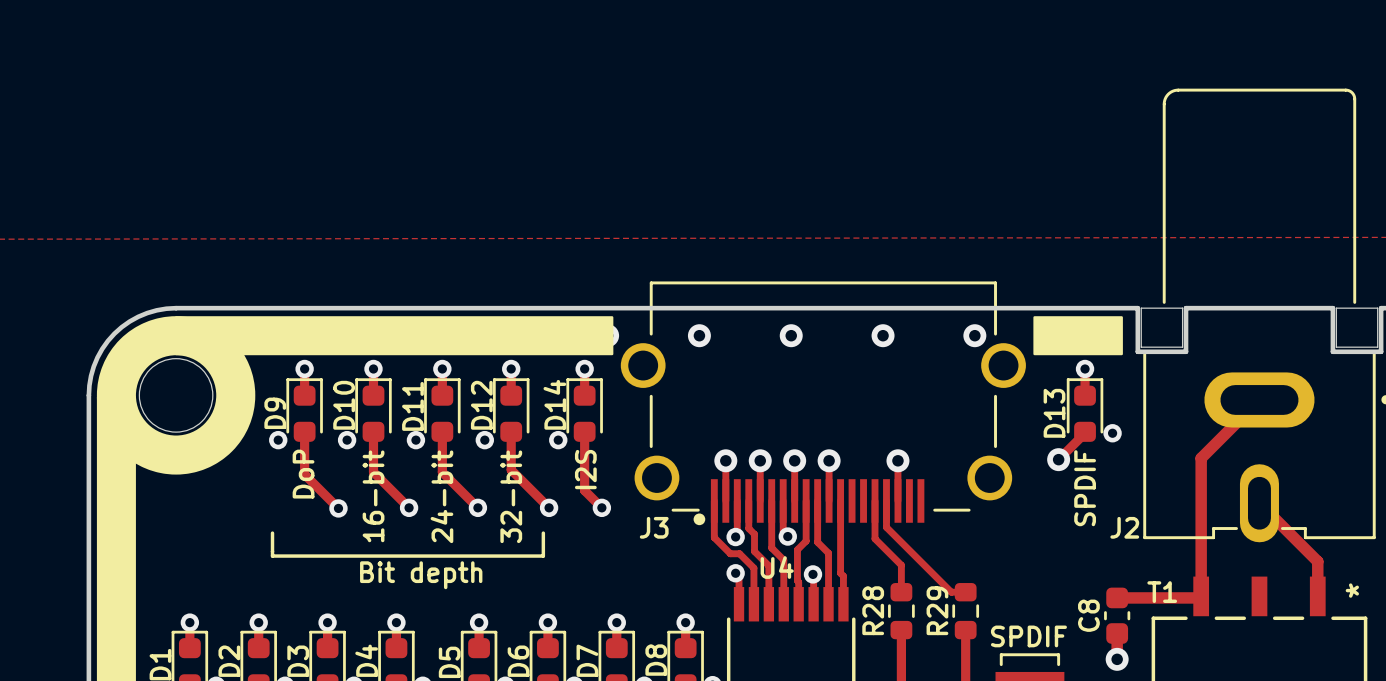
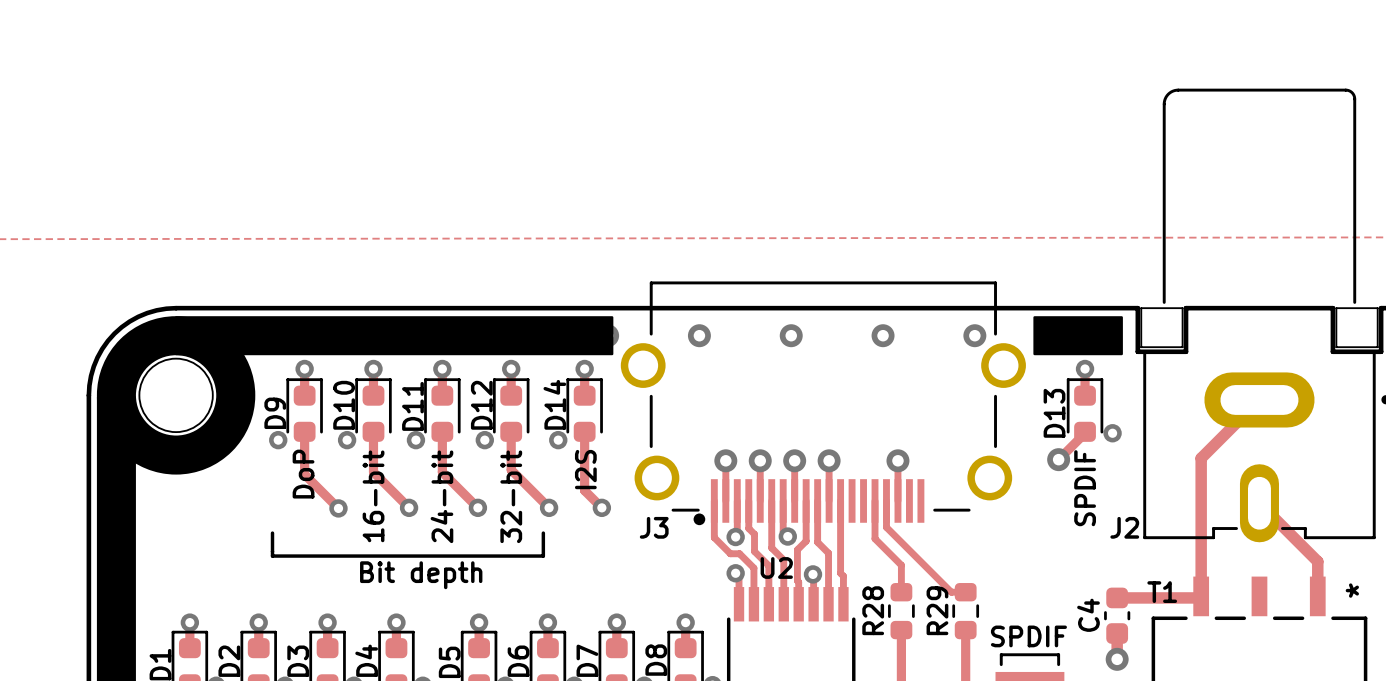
U4 name: U4 (777, 567) -> U2 (776, 567)
C8 name: C8 (1088, 615) -> C4 (1088, 615)

